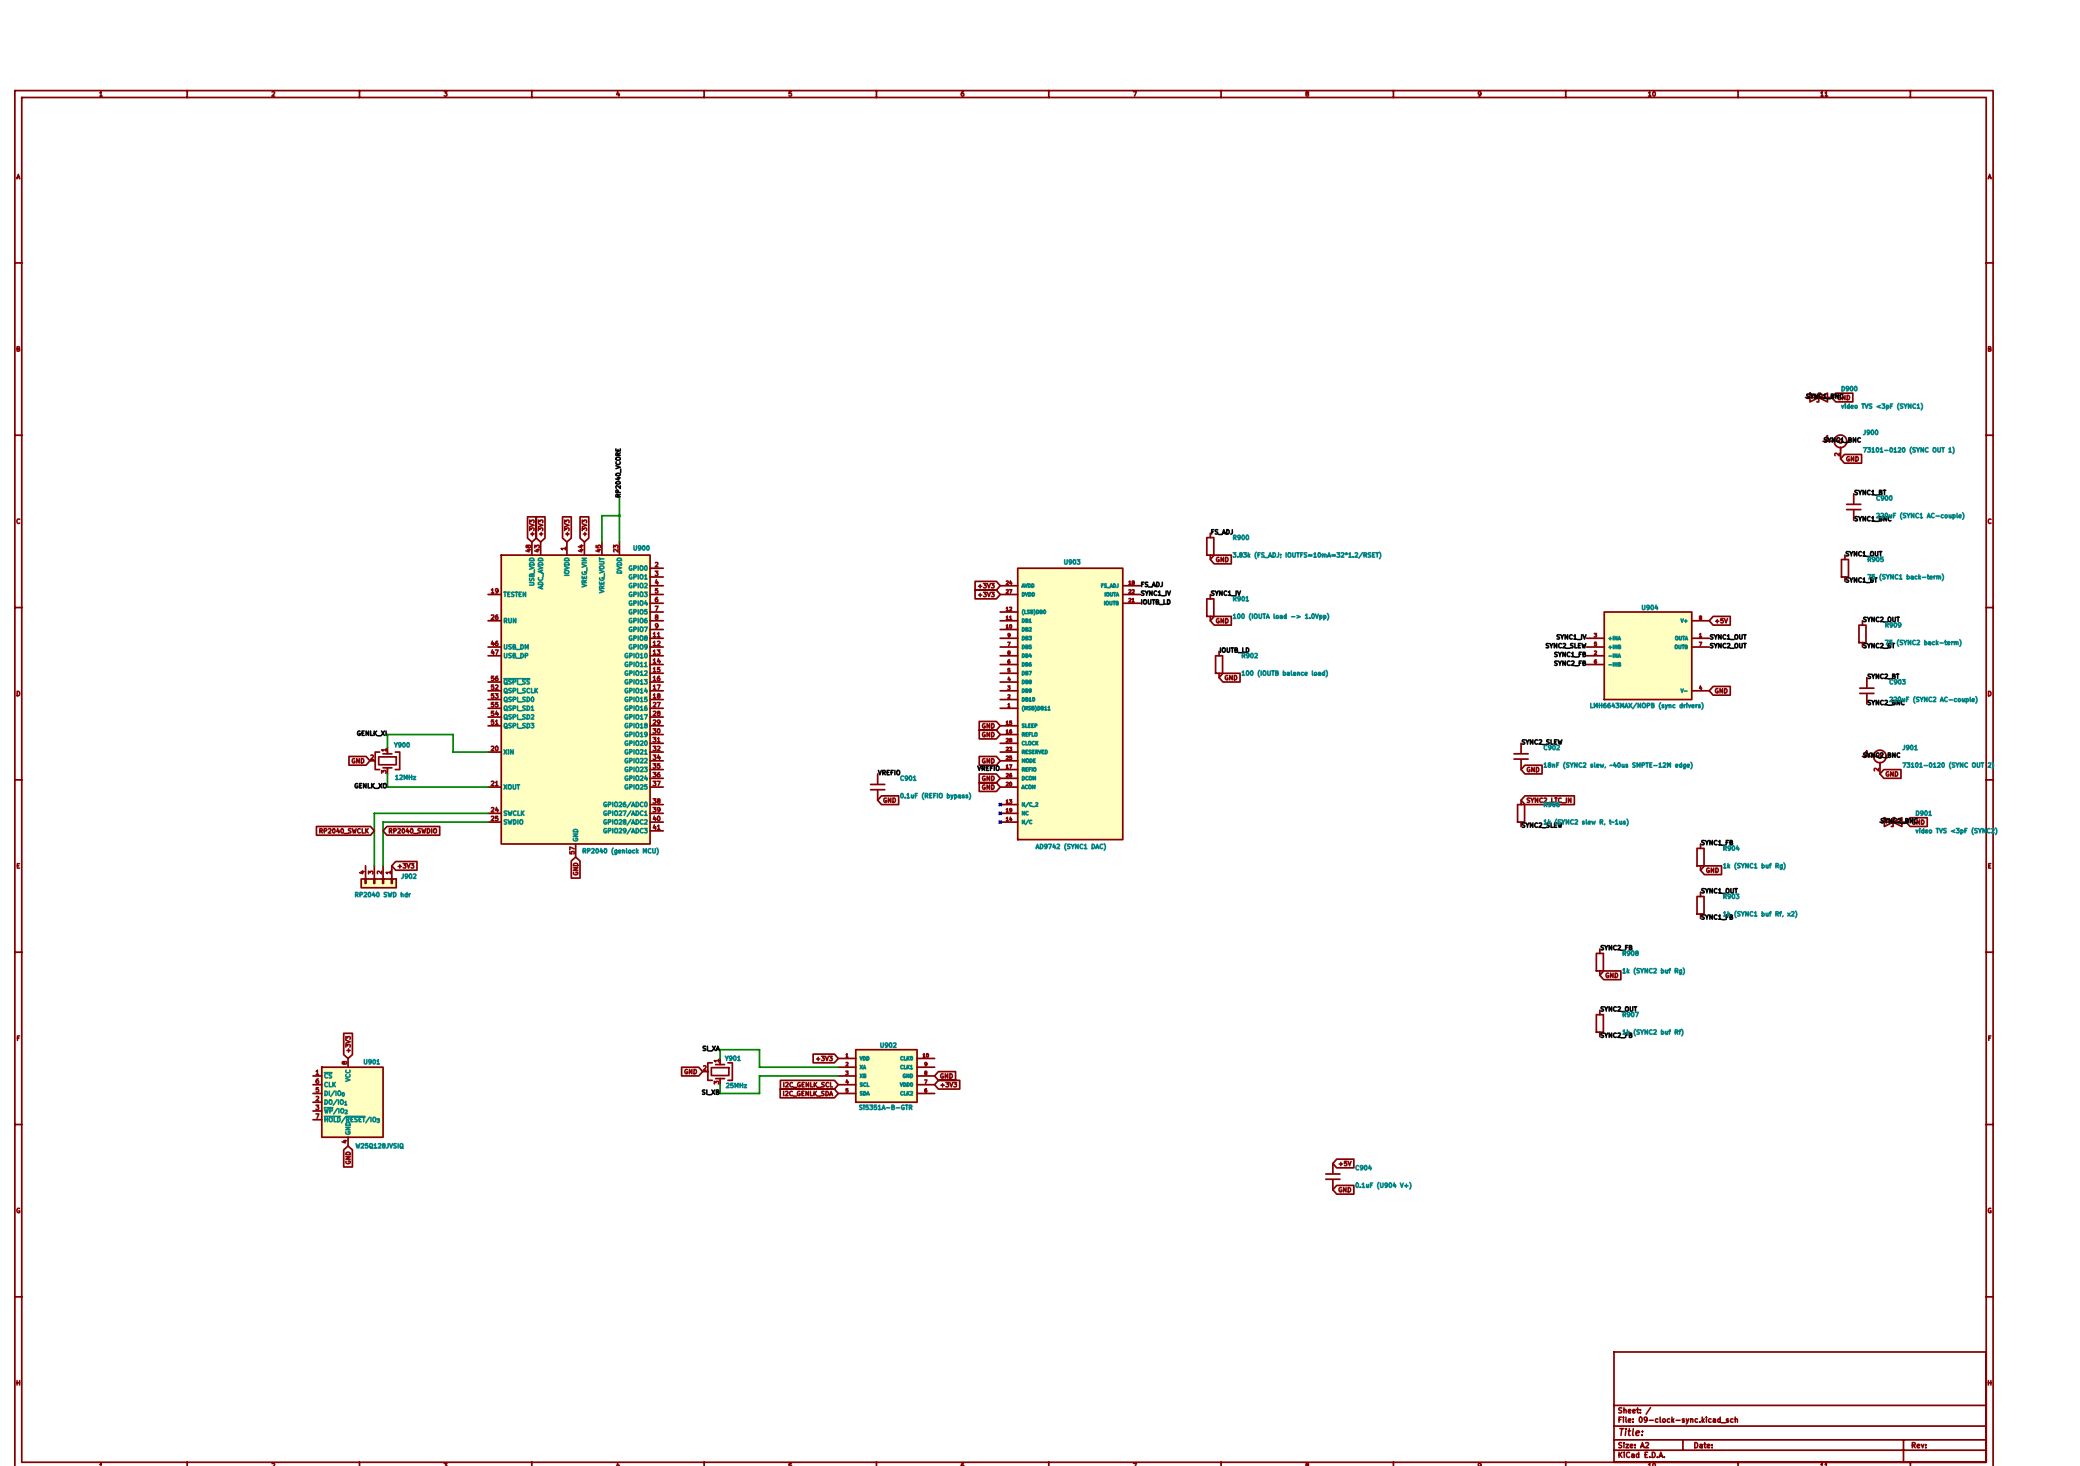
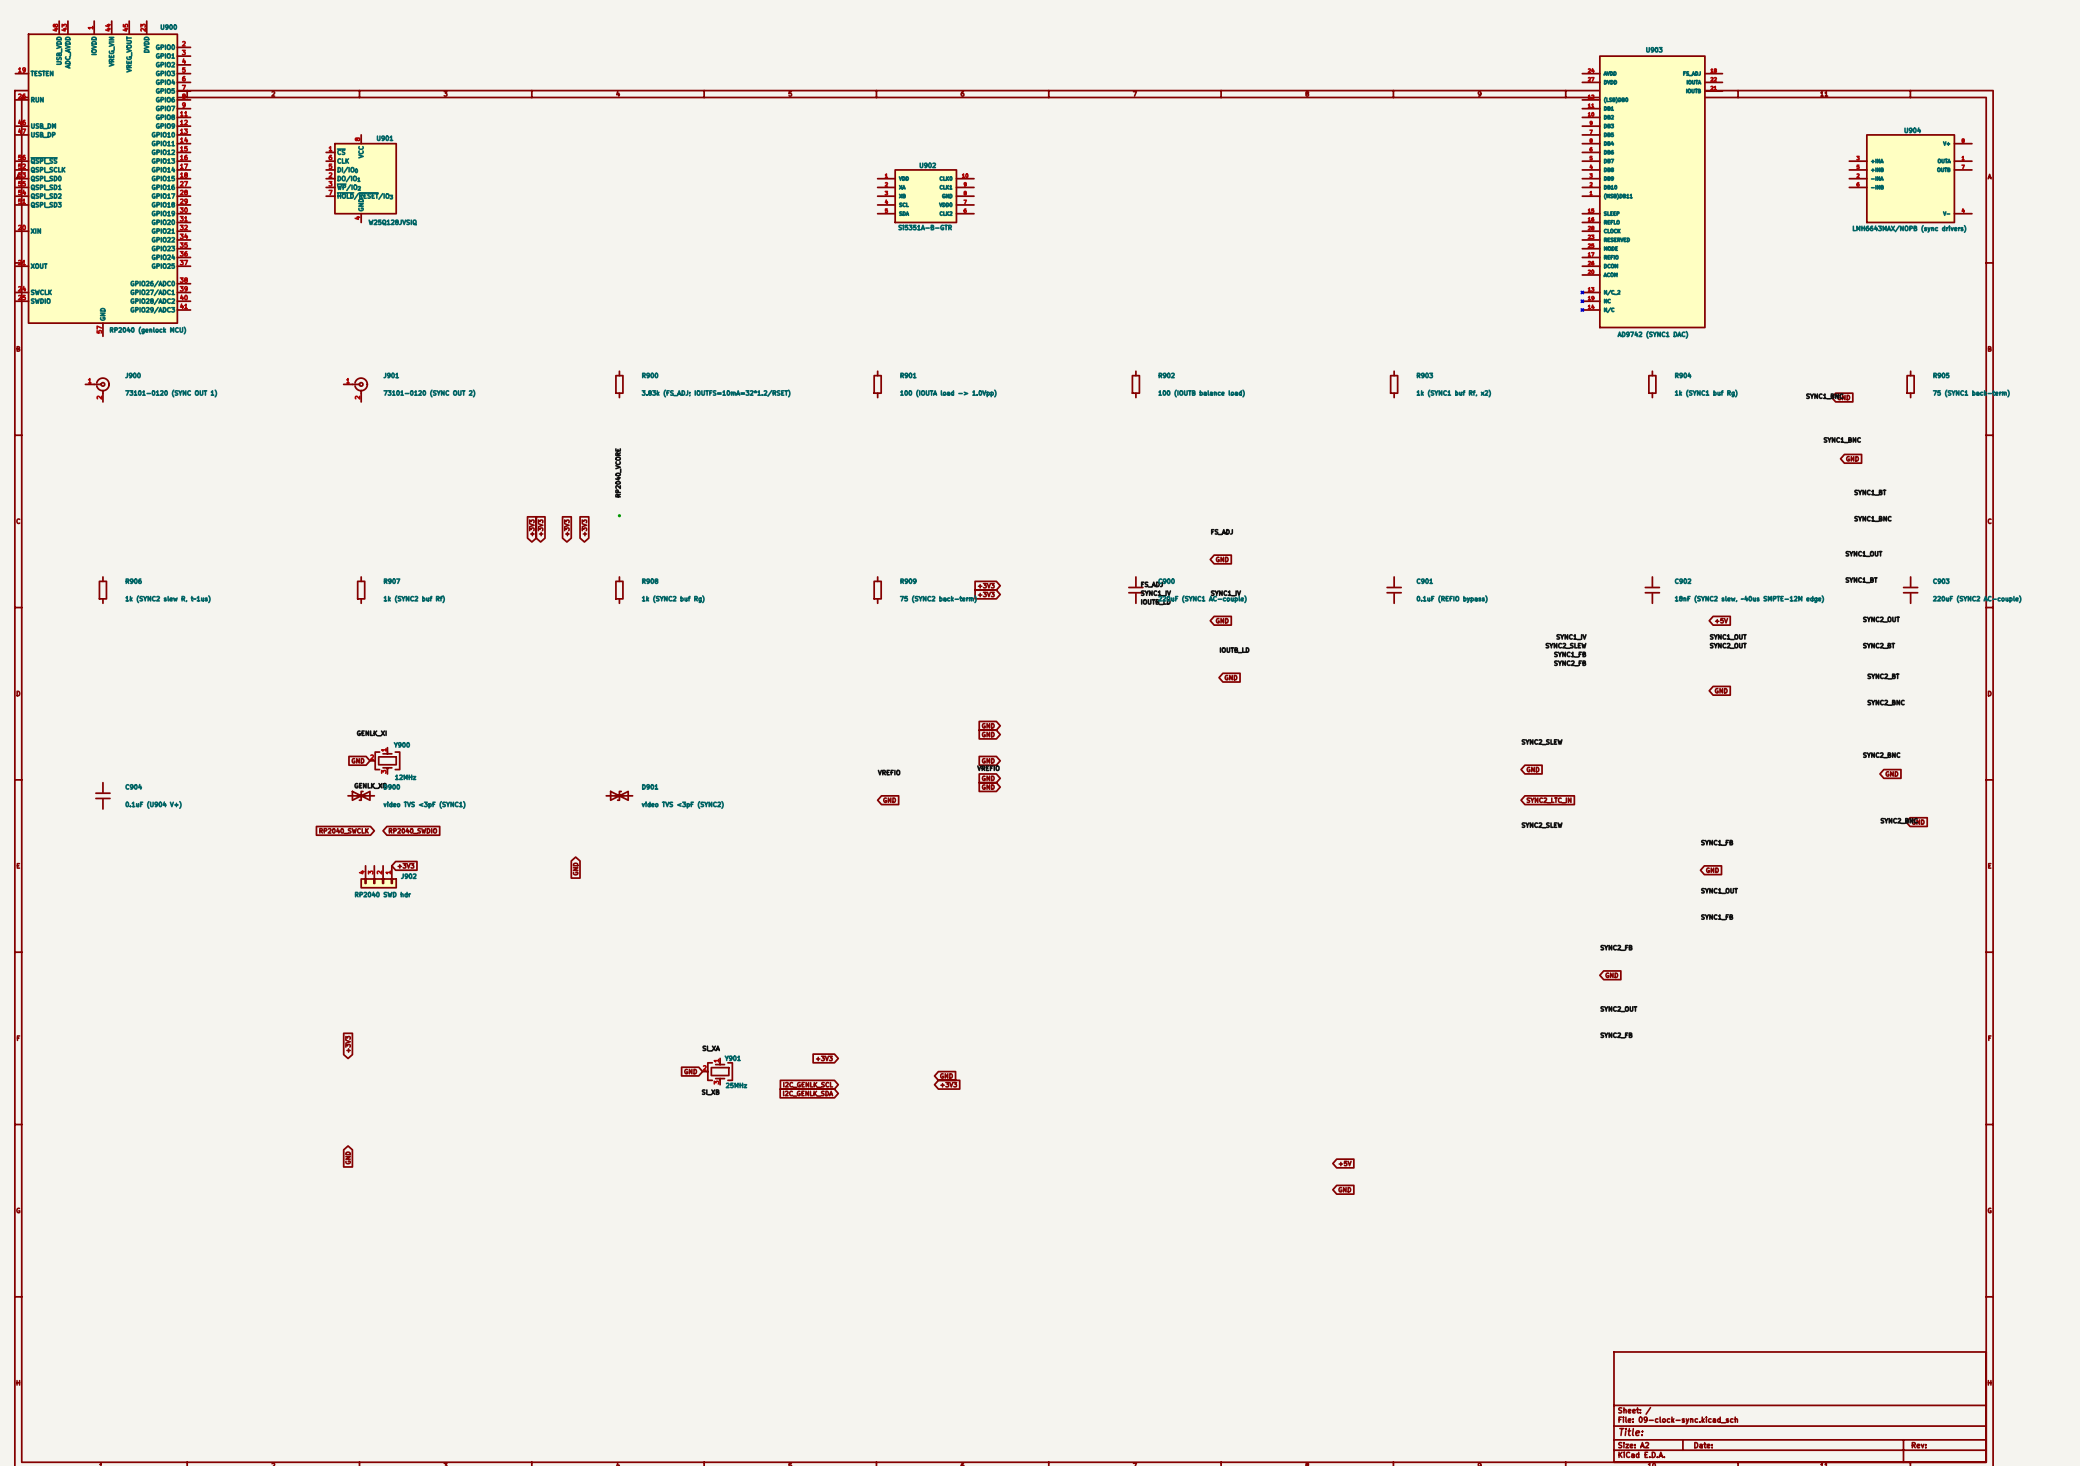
part position: (1818, 397) -> (361, 795)
part position: (1835, 446) -> (97, 389)
wire: (619, 498) (619, 541) -> none
part position: (1853, 506) -> (1135, 590)
wire: (619, 515) (601, 515) (601, 541) -> none
part position: (1210, 546) -> (619, 384)
part position: (1844, 568) -> (1910, 384)
part position: (1210, 607) -> (877, 384)
part position: (1862, 633) -> (877, 590)
part position: (1648, 655) -> (1910, 178)
part position: (1219, 664) -> (1135, 384)
part position: (1866, 690) -> (1910, 590)
part position: (575, 699) -> (102, 178)
part position: (1069, 703) -> (1651, 191)
wire: (387, 747) (387, 734) (453, 734) (453, 752) (488, 752) -> none
part position: (1521, 756) -> (1652, 590)
part position: (1874, 761) -> (355, 389)
wire: (387, 773) (387, 787) (488, 787) -> none
part position: (877, 787) -> (1394, 590)
wire: (488, 813) (374, 813) (374, 865) -> none
part position: (1521, 813) -> (102, 590)
wire: (488, 822) (383, 822) (383, 865) -> none
part position: (1893, 822) -> (619, 795)
part position: (1700, 857) -> (1652, 384)
part position: (1700, 905) -> (1394, 384)
part position: (1599, 962) -> (619, 590)
part position: (1599, 1023) -> (361, 590)
wire: (720, 1058) (720, 1049) (759, 1049) (759, 1067) (838, 1067) -> none
wire: (838, 1075) (759, 1075) (759, 1093) (720, 1093) (720, 1084) -> none
part position: (886, 1075) -> (925, 196)
part position: (348, 1102) -> (361, 178)
part position: (1332, 1176) -> (102, 795)

